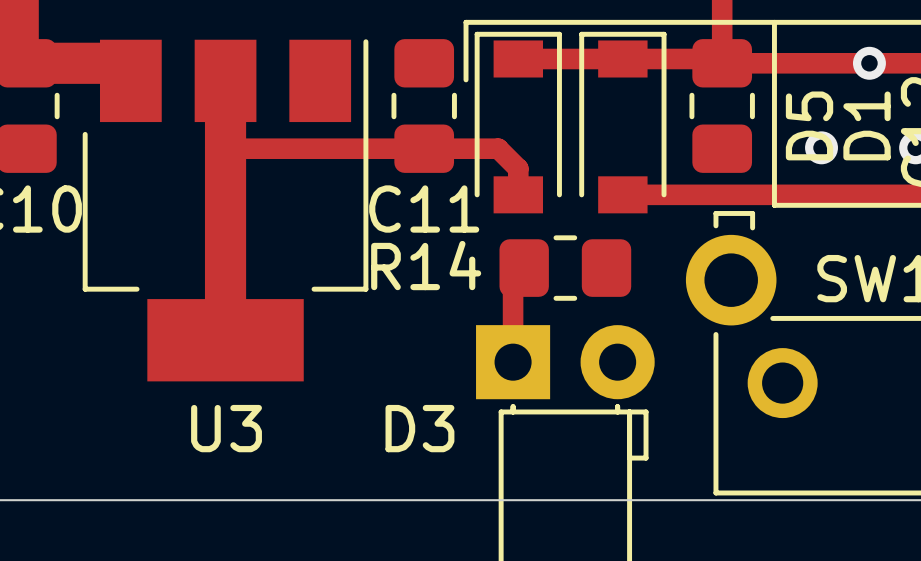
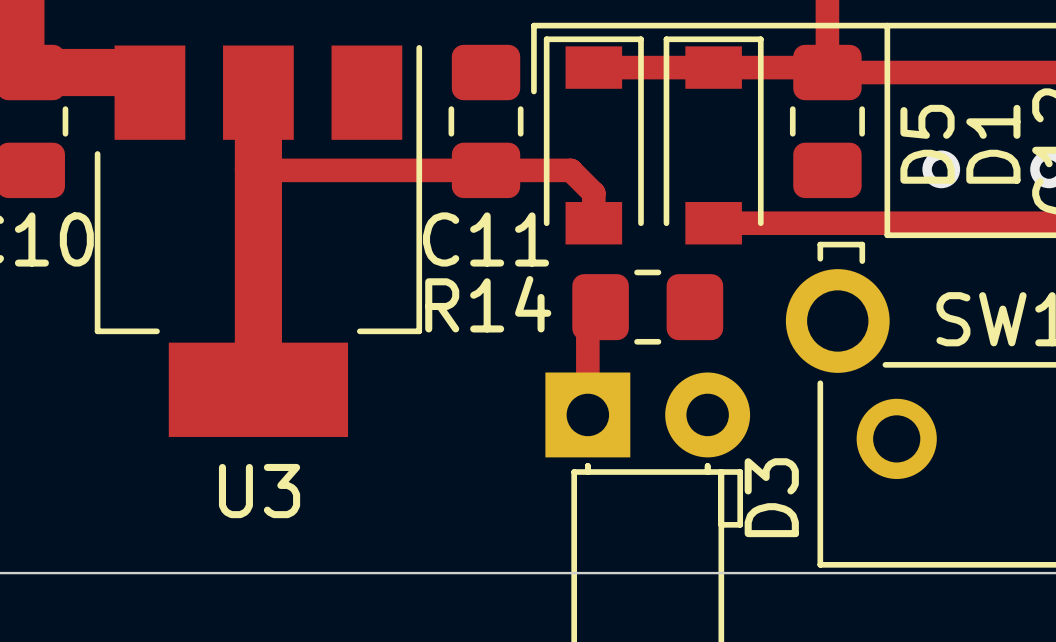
via: (869, 63) -> none
D3 name rotation: 0° (419, 428) -> 90° counterclockwise (771, 497)
D3 name position: D3 (419, 428) -> D3 (771, 497)

